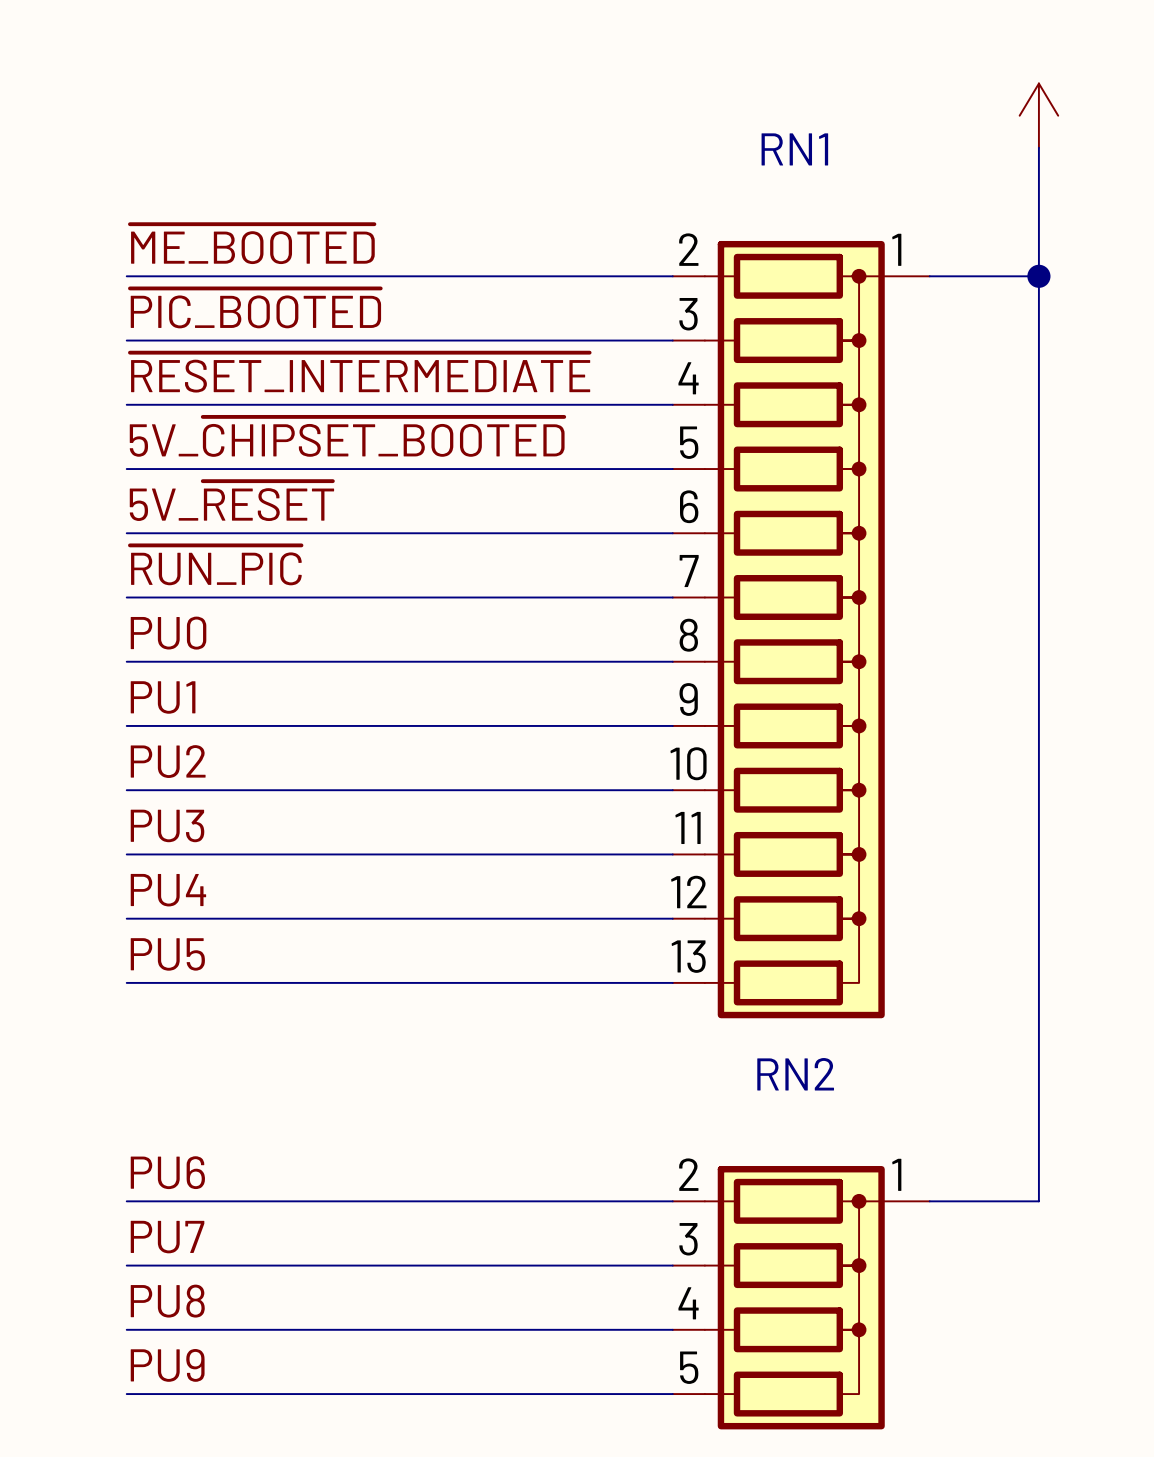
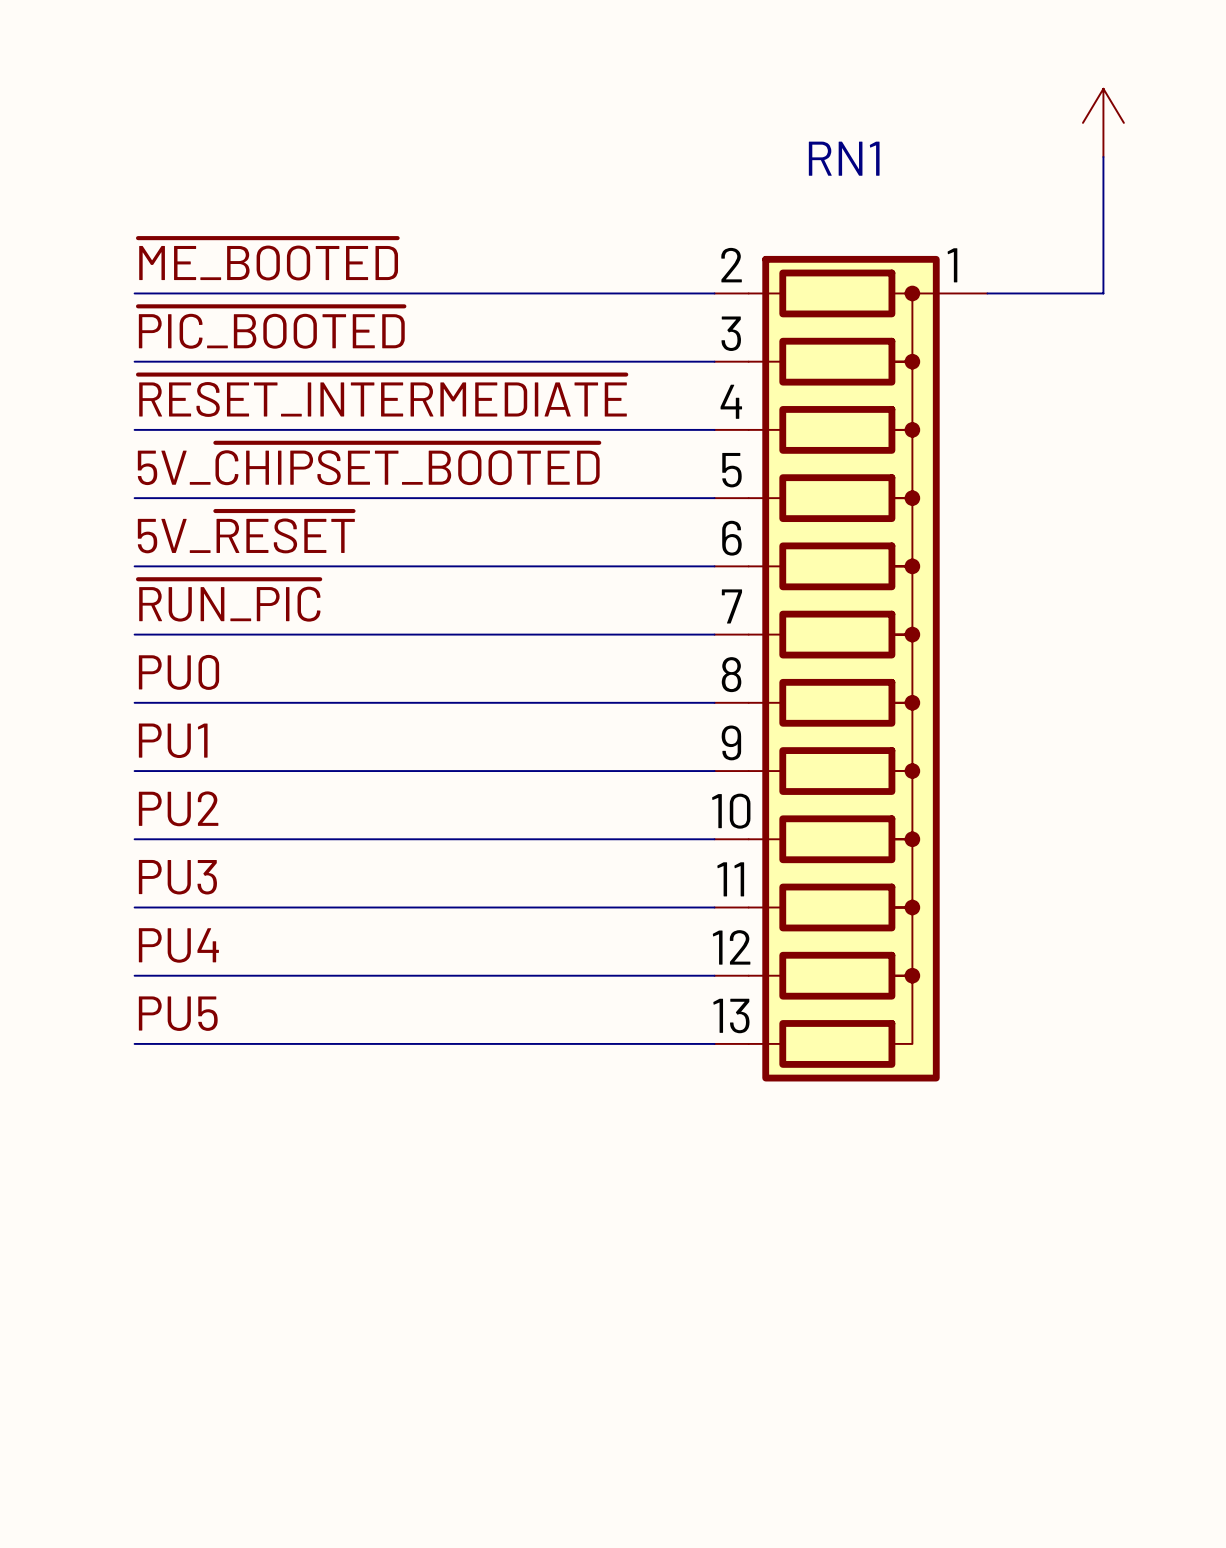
wire: (1038, 276) (1038, 1201) (929, 1201) -> none
junction: (1038, 276) -> none
label: PU6 (167, 1172) -> none
wire: (126, 1201) (672, 1201) -> none
label: PU7 (167, 1237) -> none
wire: (126, 1265) (672, 1265) -> none
RN2: (801, 1297) -> none
label: PU8 (167, 1301) -> none
wire: (126, 1329) (672, 1329) -> none
label: PU9 (167, 1365) -> none
wire: (126, 1394) (672, 1394) -> none

